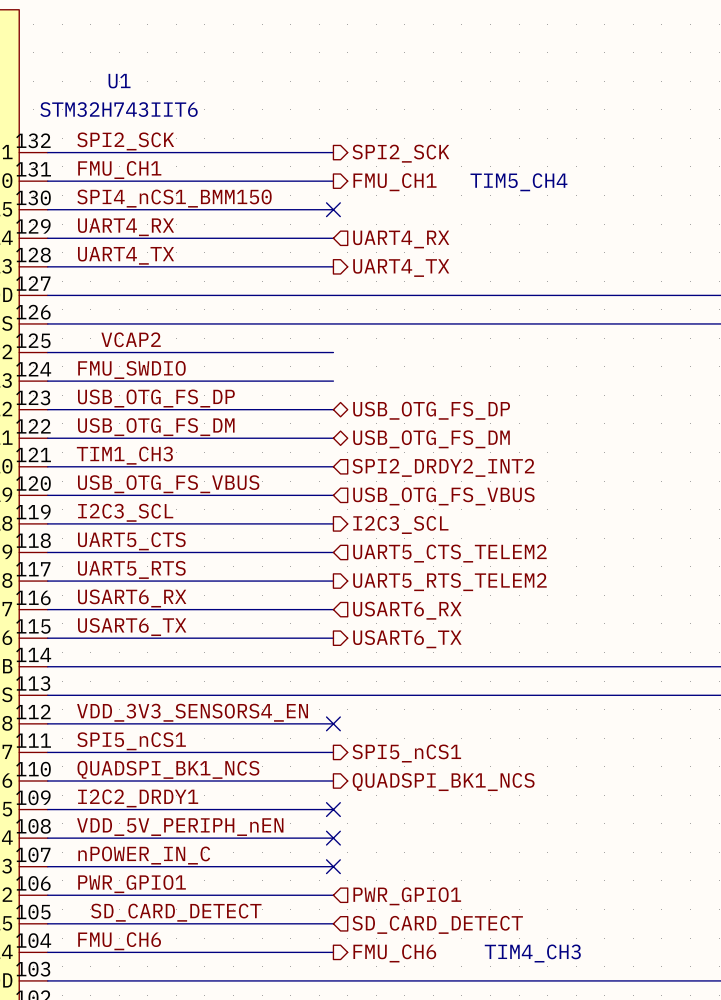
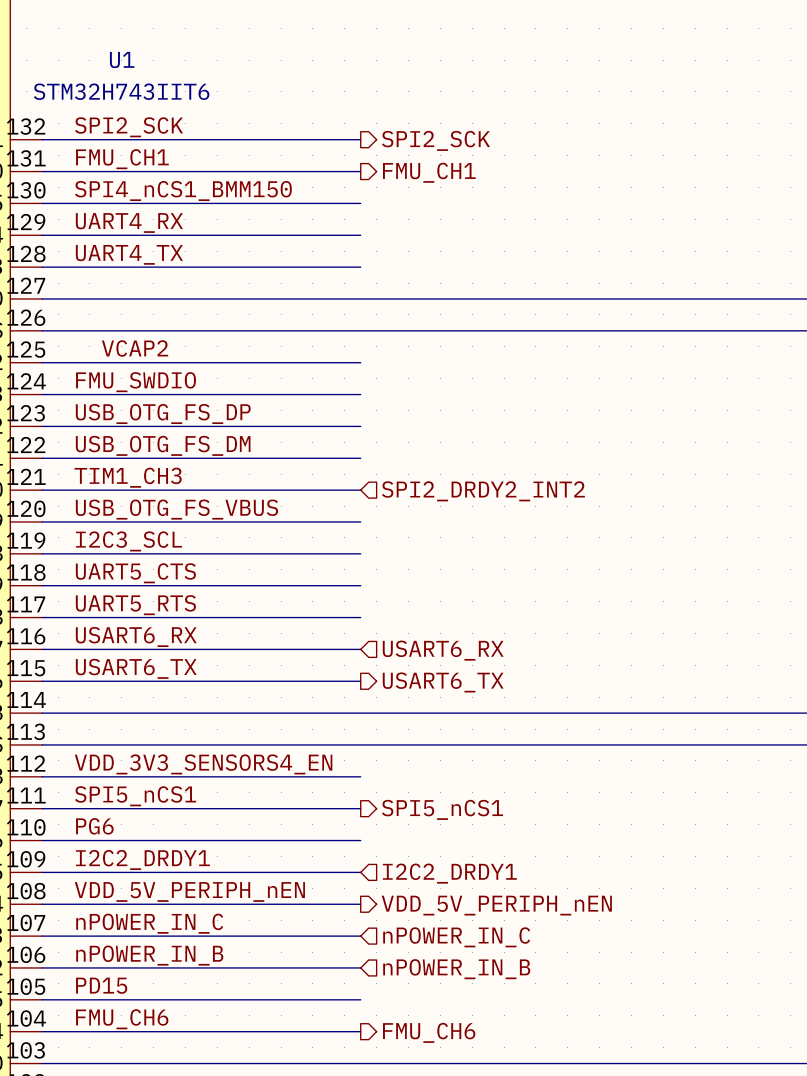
text: TIM5_CH4 (518, 182) -> none
no-connect mark: (333, 209) -> none
hierarchical label: UART4_RX (401, 239) -> none
hierarchical label: UART4_TX (401, 268) -> none
hierarchical label: USB_OTG_FS_DP (431, 410) -> none
hierarchical label: USB_OTG_FS_DM (431, 439) -> none
hierarchical label: USB_OTG_FS_VBUS (443, 496) -> none
hierarchical label: I2C3_SCL (400, 524) -> none
hierarchical label: UART5_CTS_TELEM2 (449, 553) -> none
hierarchical label: UART5_RTS_TELEM2 (449, 582) -> none
no-connect mark: (333, 723) -> none
label: QUADSPI_BK1_NCS (168, 769) -> PG6 (94, 826)
hierarchical label: QUADSPI_BK1_NCS (443, 782) -> none
no-connect mark: (333, 809) -> none
hierarchical label: none -> I2C2_DRDY1 (449, 873)
no-connect mark: (333, 838) -> none
hierarchical label: none -> VDD_5V_PERIPH_nEN (496, 905)
no-connect mark: (333, 866) -> none
hierarchical label: none -> nPOWER_IN_C (456, 937)
label: PWR_GPIO1 (132, 884) -> nPOWER_IN_B (149, 955)
hierarchical label: PWR_GPIO1 (407, 896) -> nPOWER_IN_B (456, 969)
label: none -> PD15 (101, 985)
label: SD_CARD_DETECT (176, 912) -> none
hierarchical label: SD_CARD_DETECT (437, 924) -> none
text: TIM4_CH3 (532, 953) -> none

